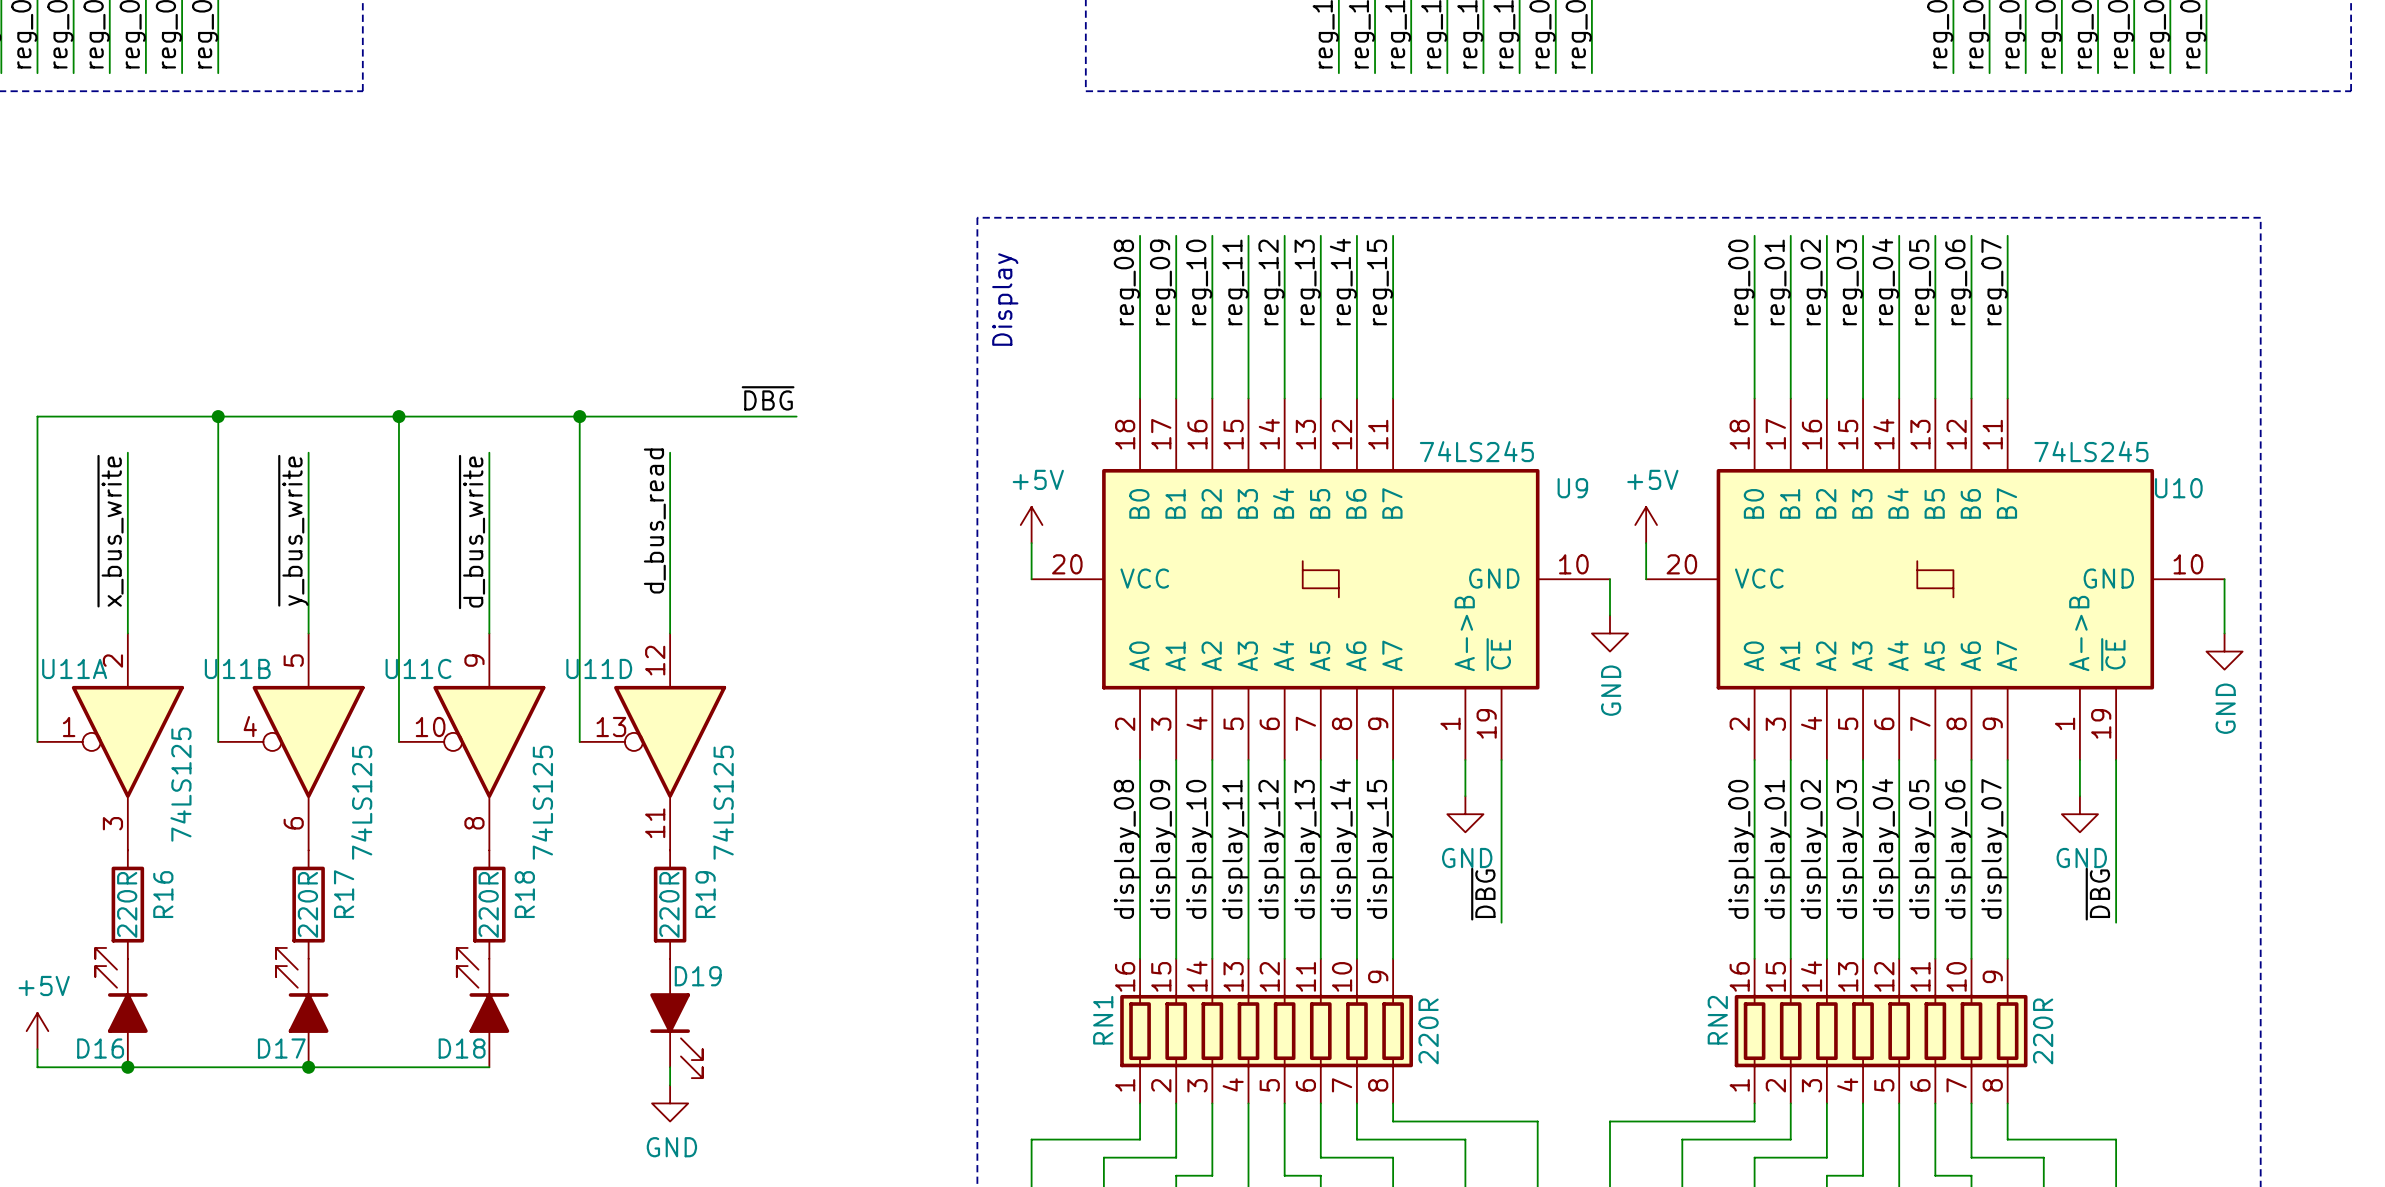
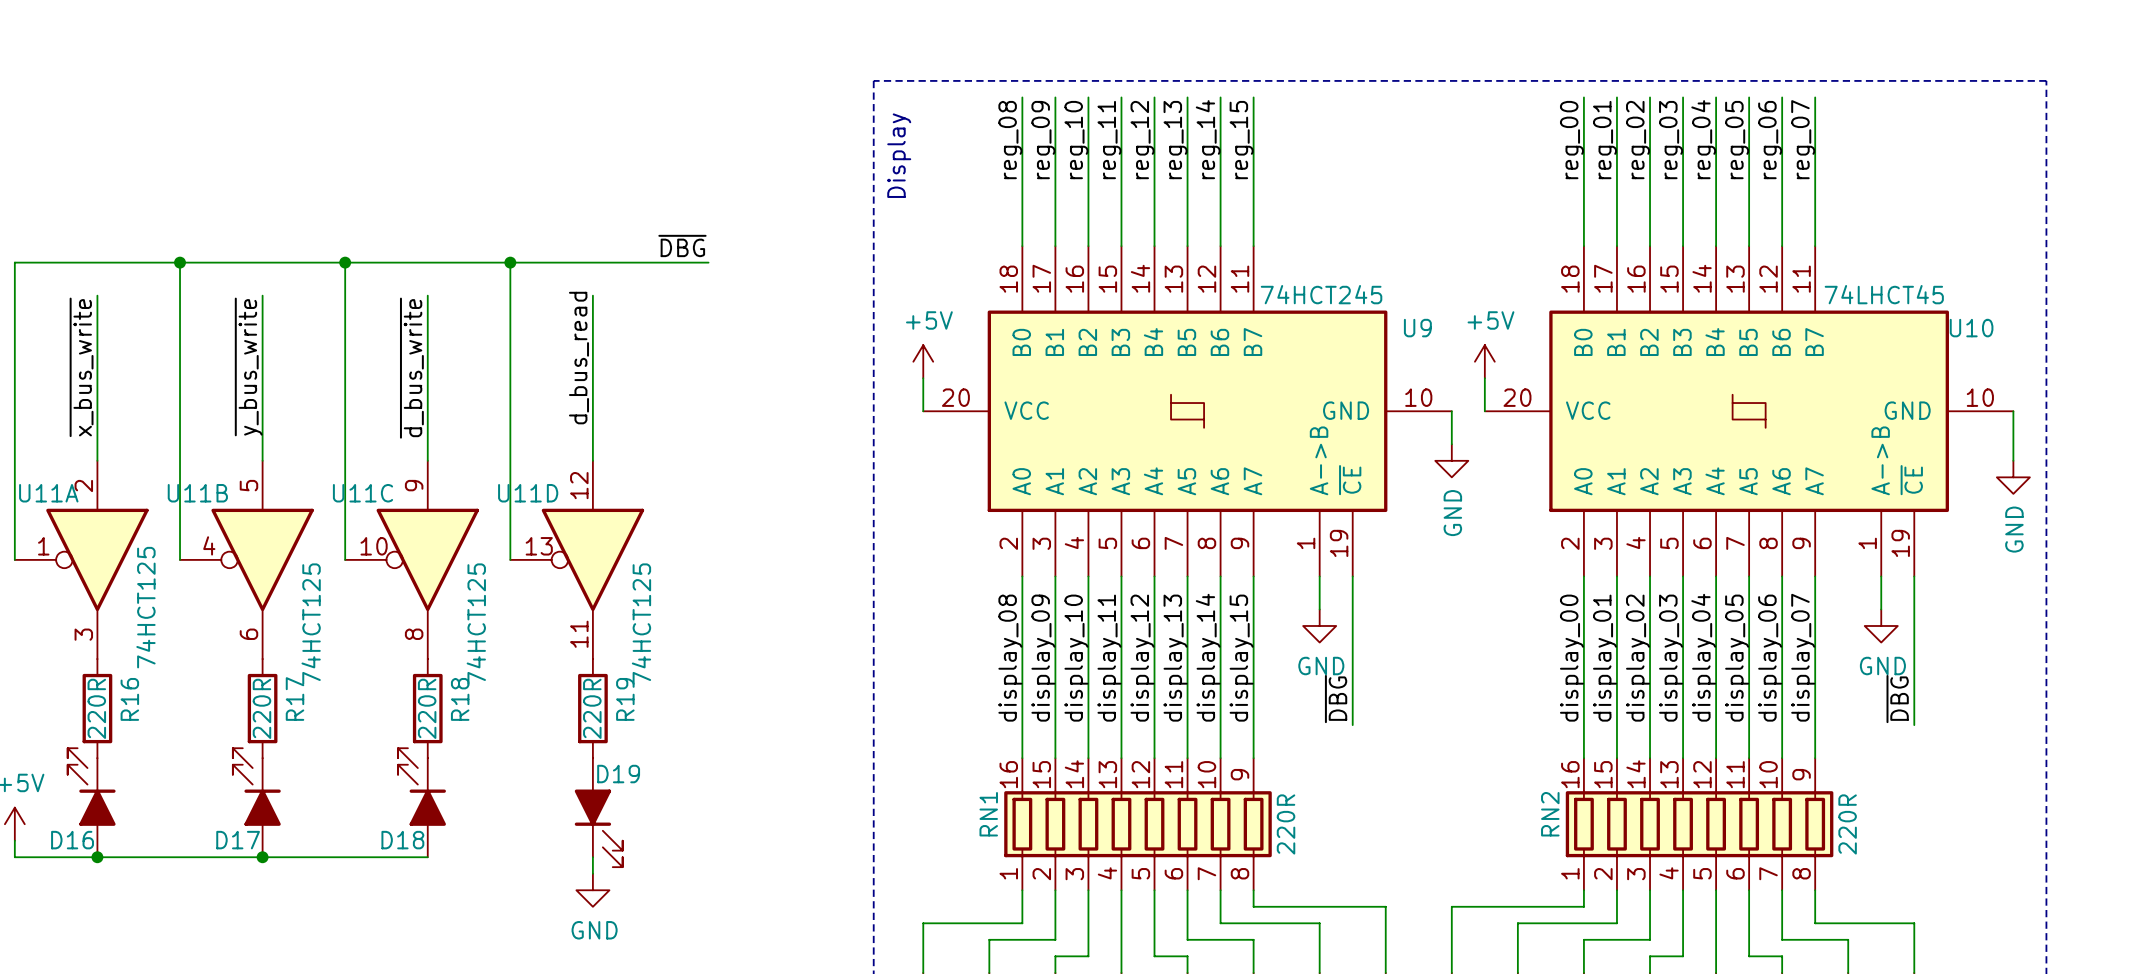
U9 value: 74LS245 (1476, 451) -> 74HCT245 (1321, 294)
U10 value: 74LS245 (2091, 451) -> 74LHCT45 (1884, 294)
U11A value: 74LS125 (180, 784) -> 74HCT125 (145, 607)
U11B value: 74LS125 (361, 802) -> 74HCT125 (311, 624)
U11C value: 74LS125 (542, 802) -> 74HCT125 (476, 624)
U11D value: 74LS125 (723, 802) -> 74HCT125 (641, 624)

